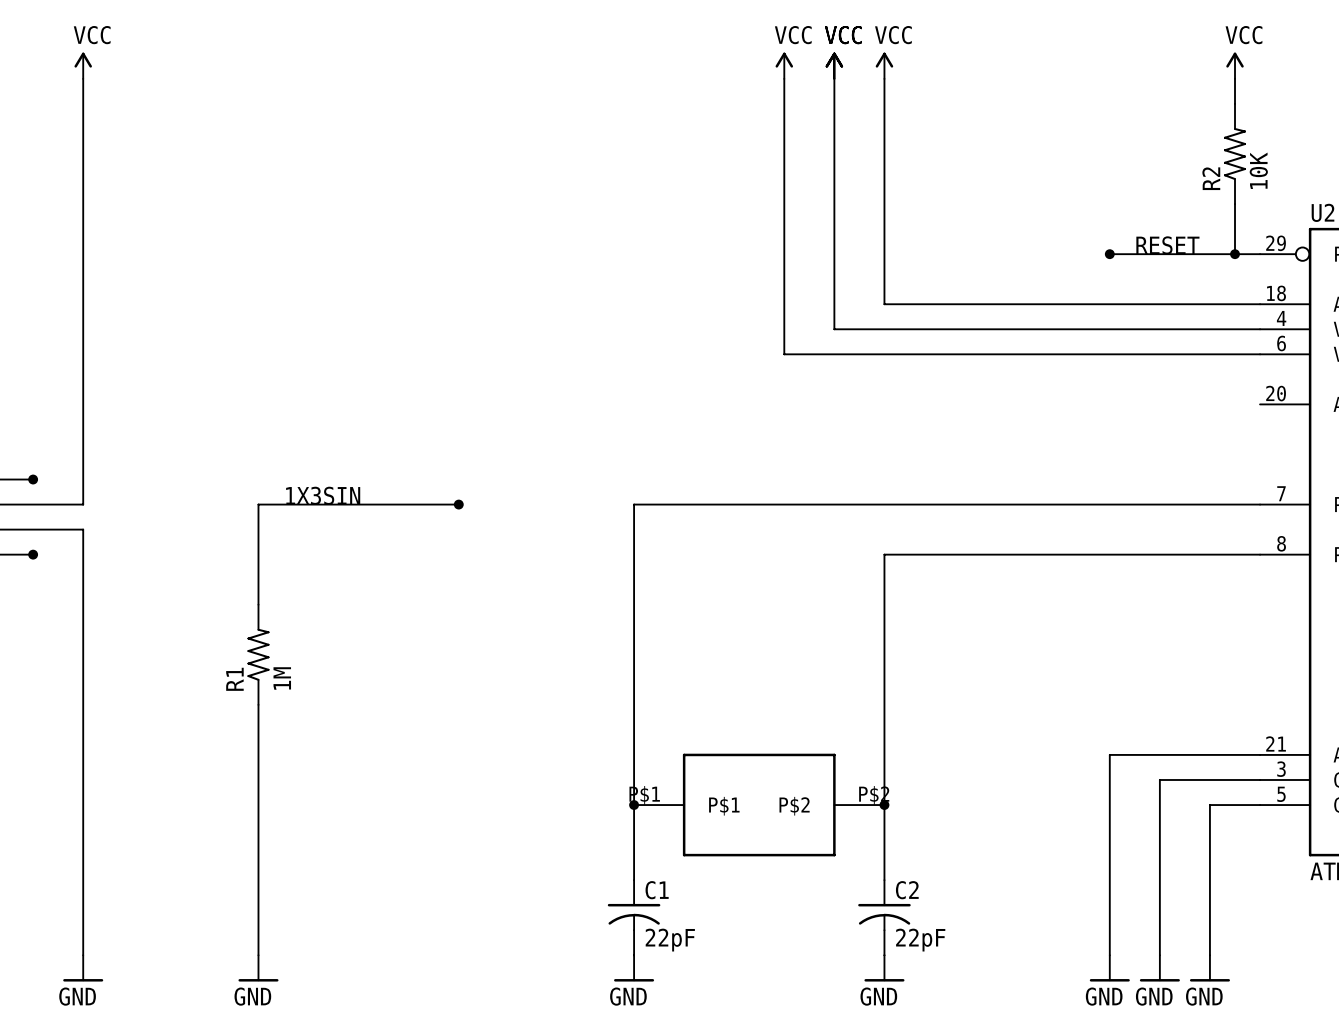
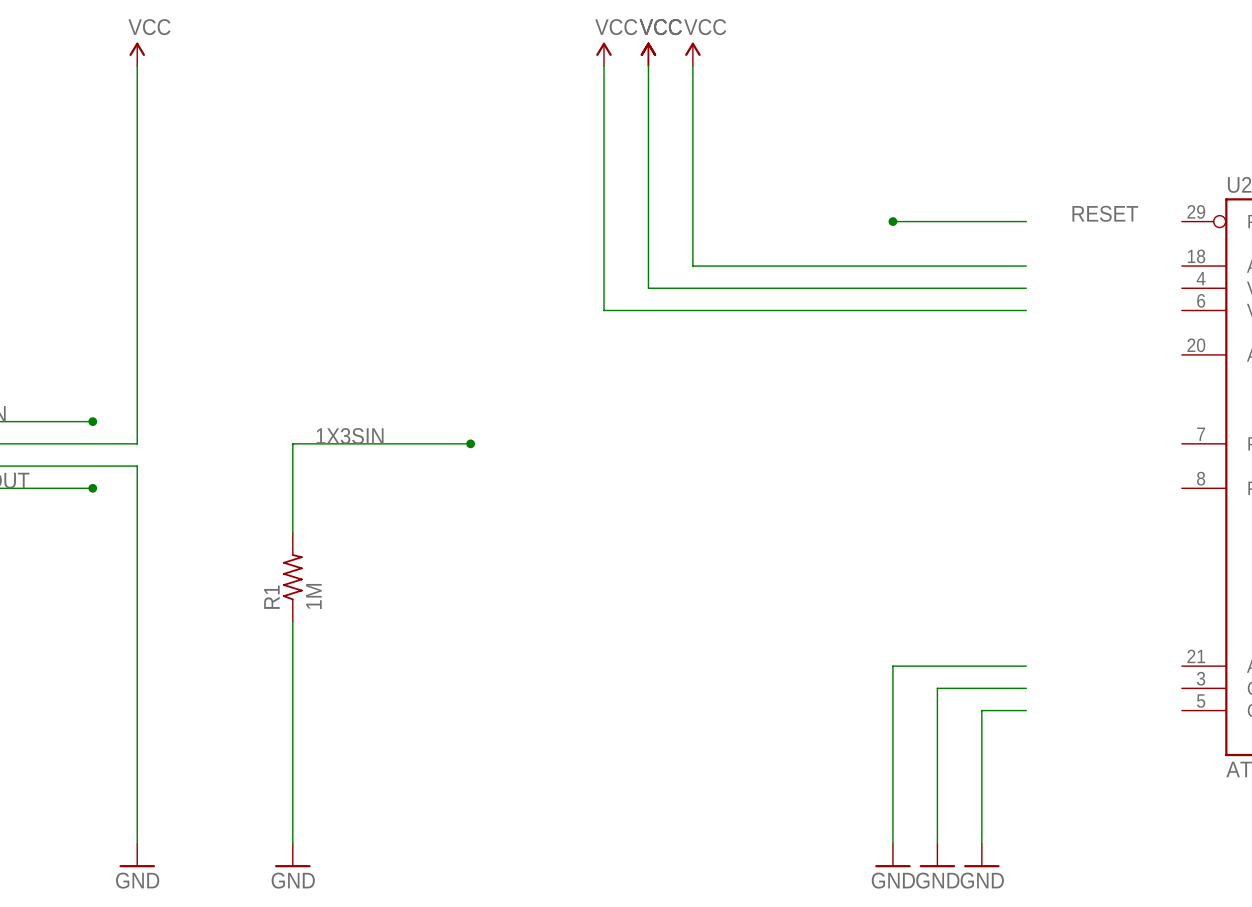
power symbol: none -> VCC (603, 54)
power symbol: none -> VCC (648, 54)
power symbol: none -> VCC (692, 54)
power symbol: VCC (784, 65) -> none
power symbol: VCC (834, 65) -> none
power symbol: VCC (884, 65) -> none
power symbol: VCC (1235, 65) -> none
wire: (784, 78) (784, 354) -> (603, 65) (603, 310) (759, 310)
wire: (834, 78) (834, 329) -> (648, 65) (648, 288) (804, 288)
wire: (884, 78) (884, 304) -> (692, 65) (692, 266) (848, 266)
wire: (1235, 78) (1235, 103) -> none
R2: 10K (1235, 154) -> none
wire: (1235, 204) (1235, 254) -> none
junction: none -> (892, 221)
wire: (1109, 254) (1260, 254) -> (892, 221) (1026, 221)
junction: (1109, 254) -> none
junction: (1235, 254) -> none
wire: (1084, 304) (1260, 304) -> none
wire: (1084, 329) (1260, 329) -> none
wire: (1084, 354) (1260, 354) -> none
wire: (1260, 504) (634, 504) (634, 880) -> none
wire: (1260, 554) (884, 554) (884, 880) -> none
wire: (1260, 754) (1109, 754) (1109, 955) -> (1026, 666) (892, 666) (892, 843)
wire: (1260, 779) (1159, 779) (1159, 955) -> (1026, 688) (937, 688) (937, 843)
junction: (634, 805) -> none
part: (759, 805) -> none
junction: (884, 805) -> none
wire: (1260, 805) (1209, 805) (1209, 955) -> (1026, 710) (981, 710) (981, 843)
C1: 22pF (634, 917) -> none
C2: 22pF (884, 917) -> none
power symbol: GND (634, 968) -> none
power symbol: GND (884, 968) -> none
power symbol: none -> GND (892, 855)
power symbol: none -> GND (937, 855)
power symbol: none -> GND (981, 855)
power symbol: GND (1109, 968) -> none
power symbol: GND (1159, 968) -> none
power symbol: GND (1209, 968) -> none

